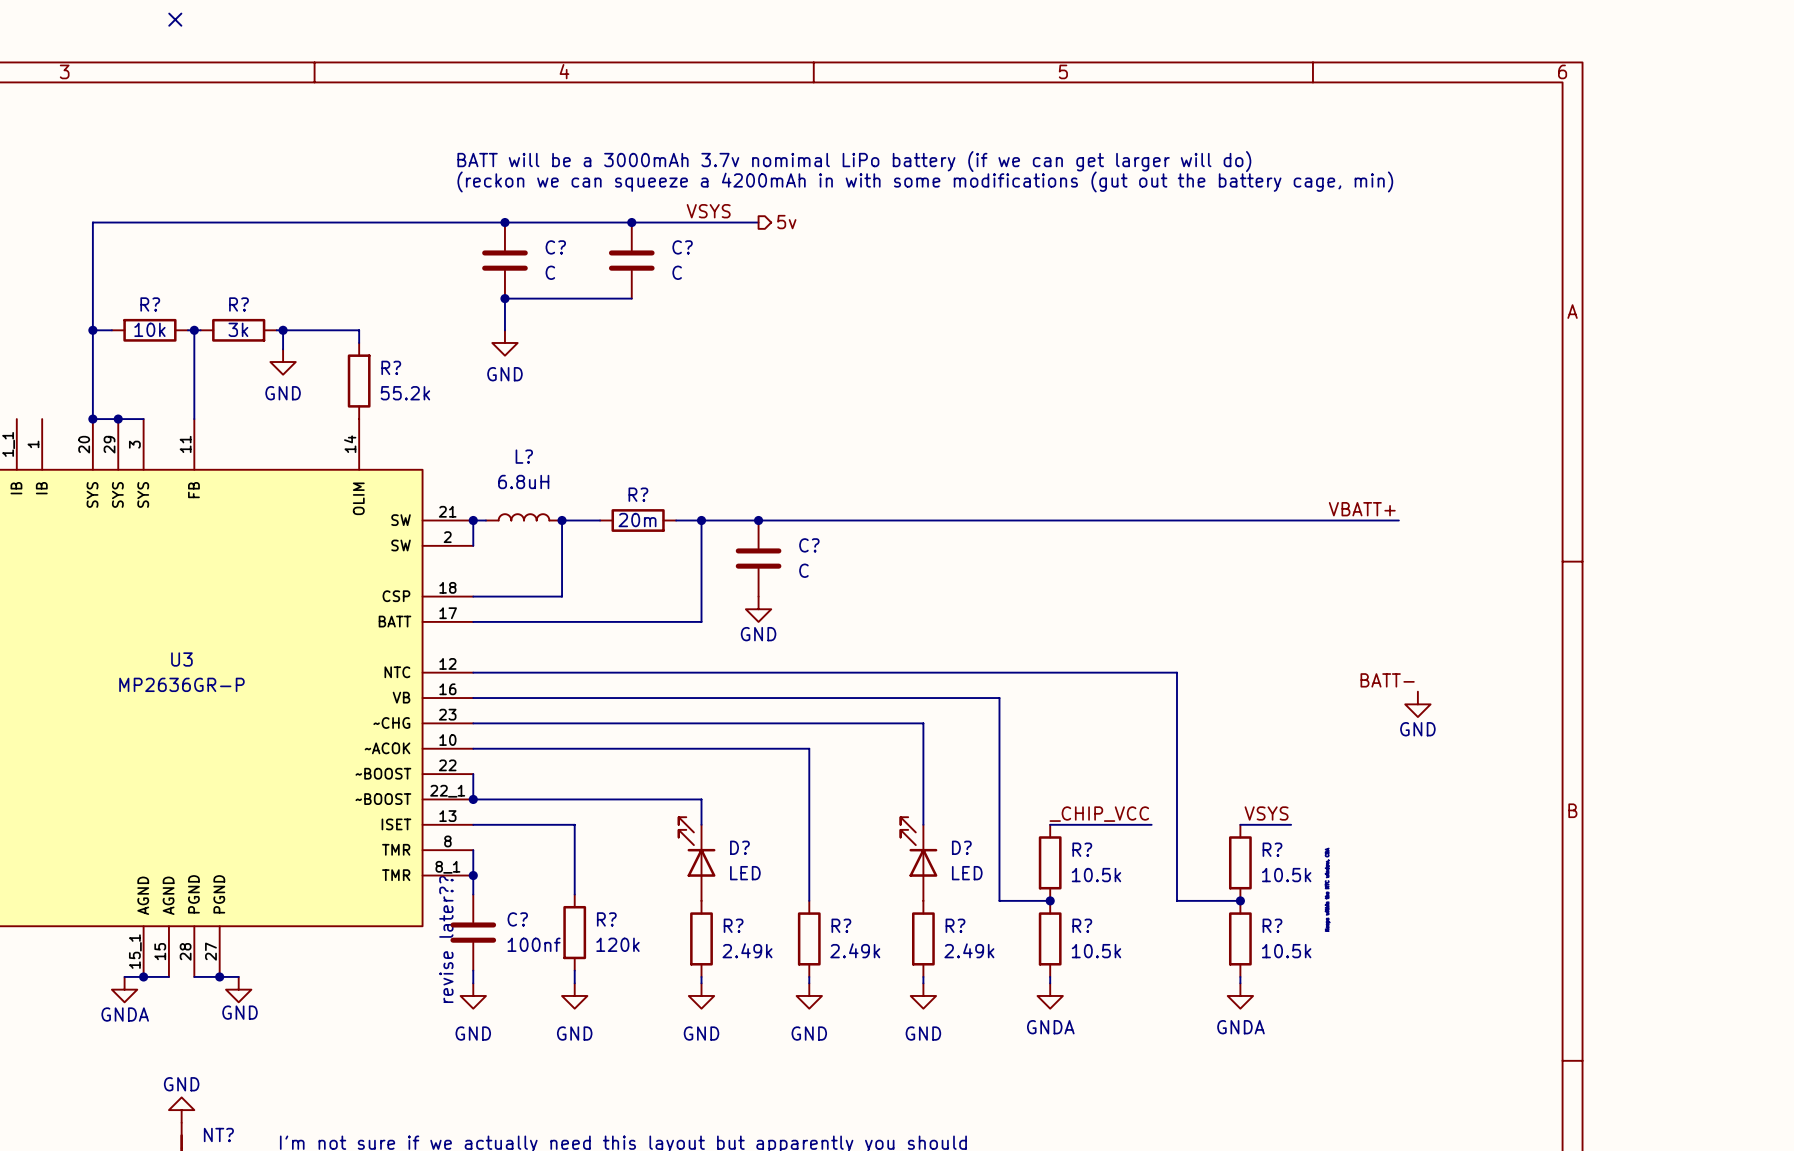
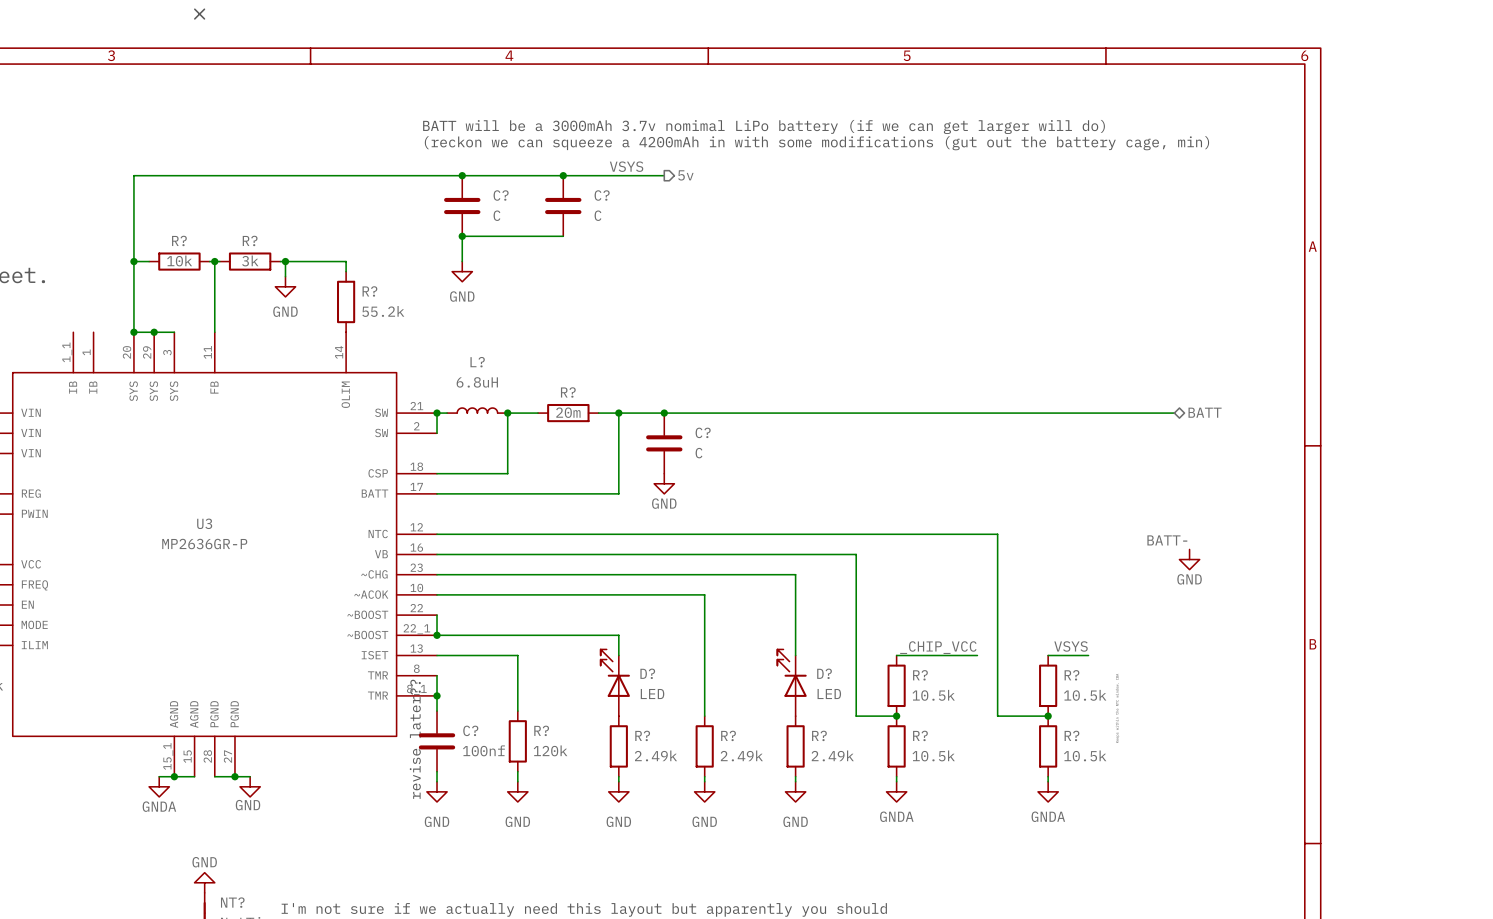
label: VBATT+ (1362, 509) -> none
hierarchical label: none -> BATT (1205, 412)

